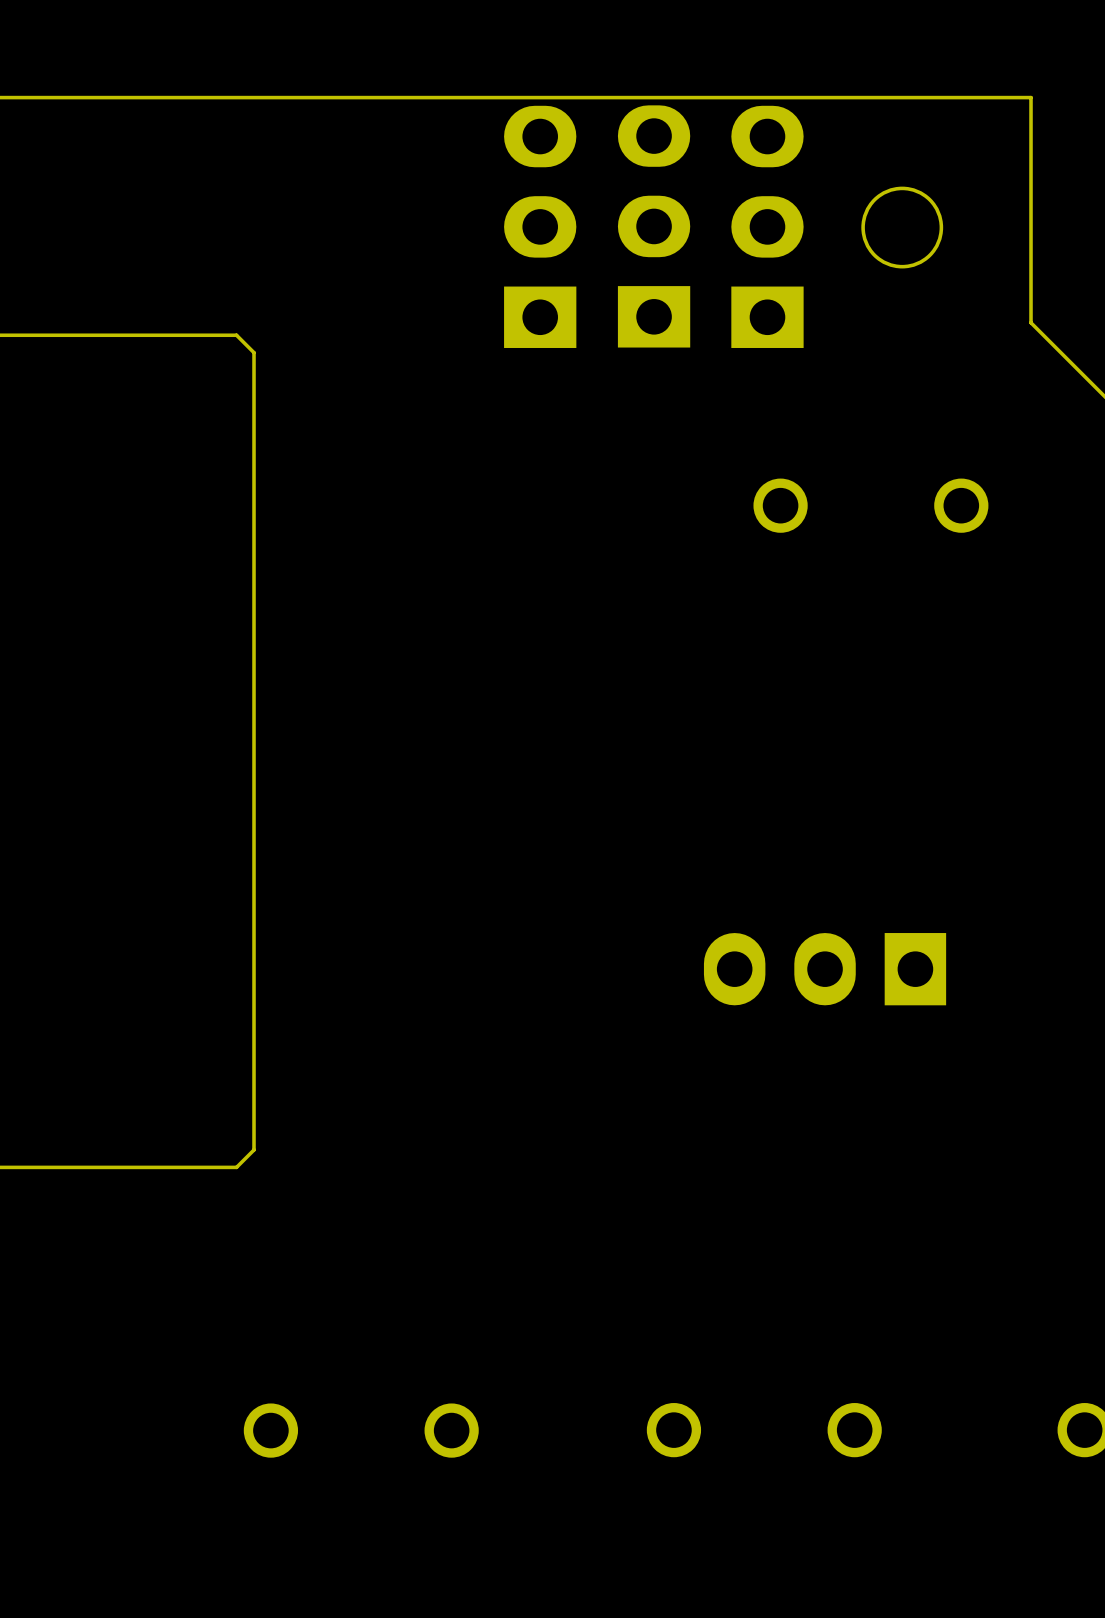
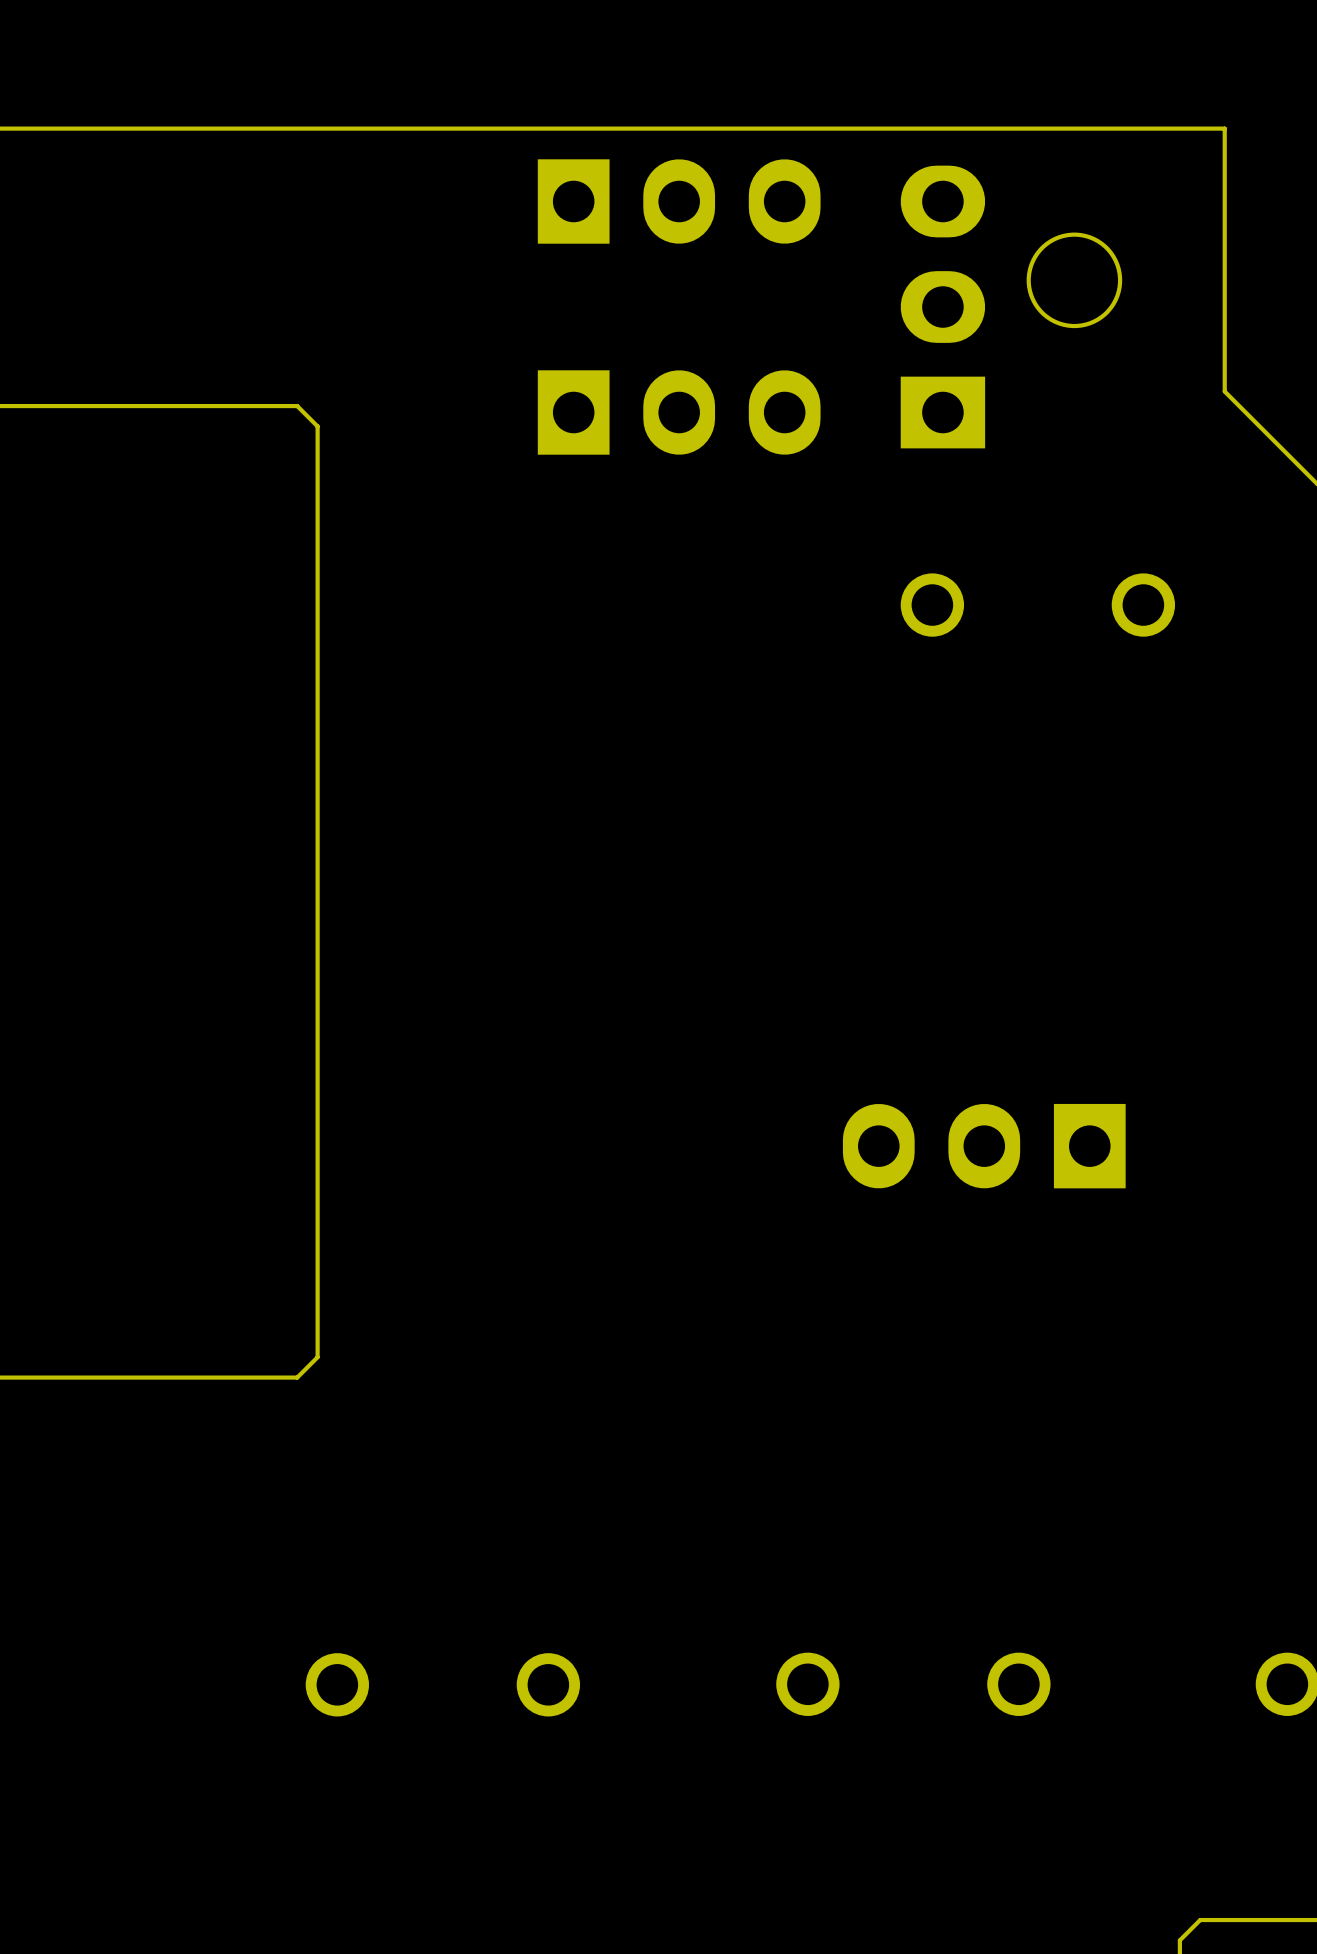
part: none -> (679, 201)
part: (540, 226) -> none
part: (654, 226) -> none
part position: (767, 226) -> (942, 307)
part: none -> (679, 412)

